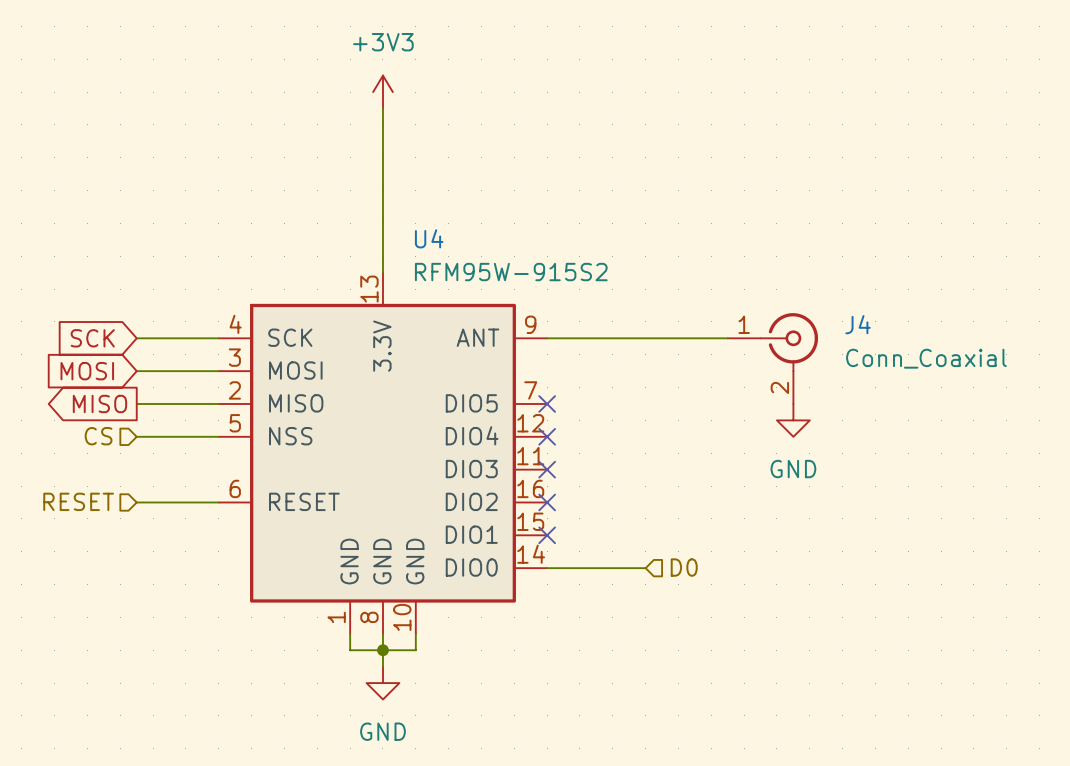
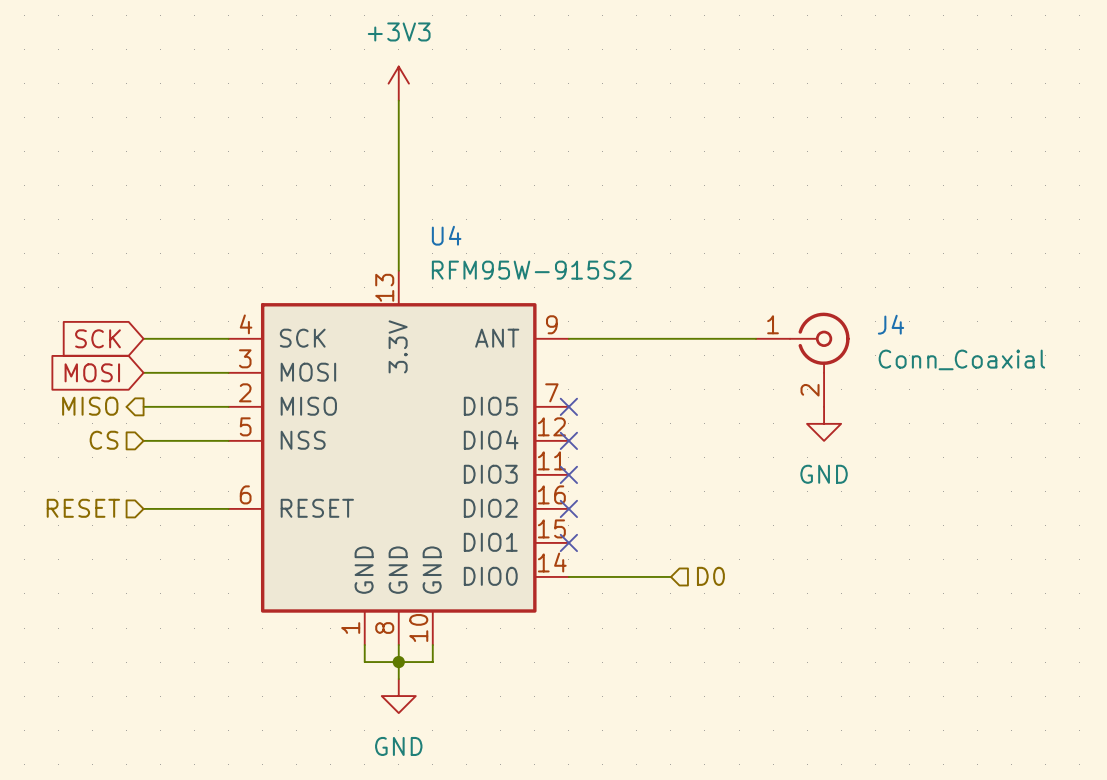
hierarchical label: none -> MISO (90, 406)
global label: MISO (99, 403) -> none

